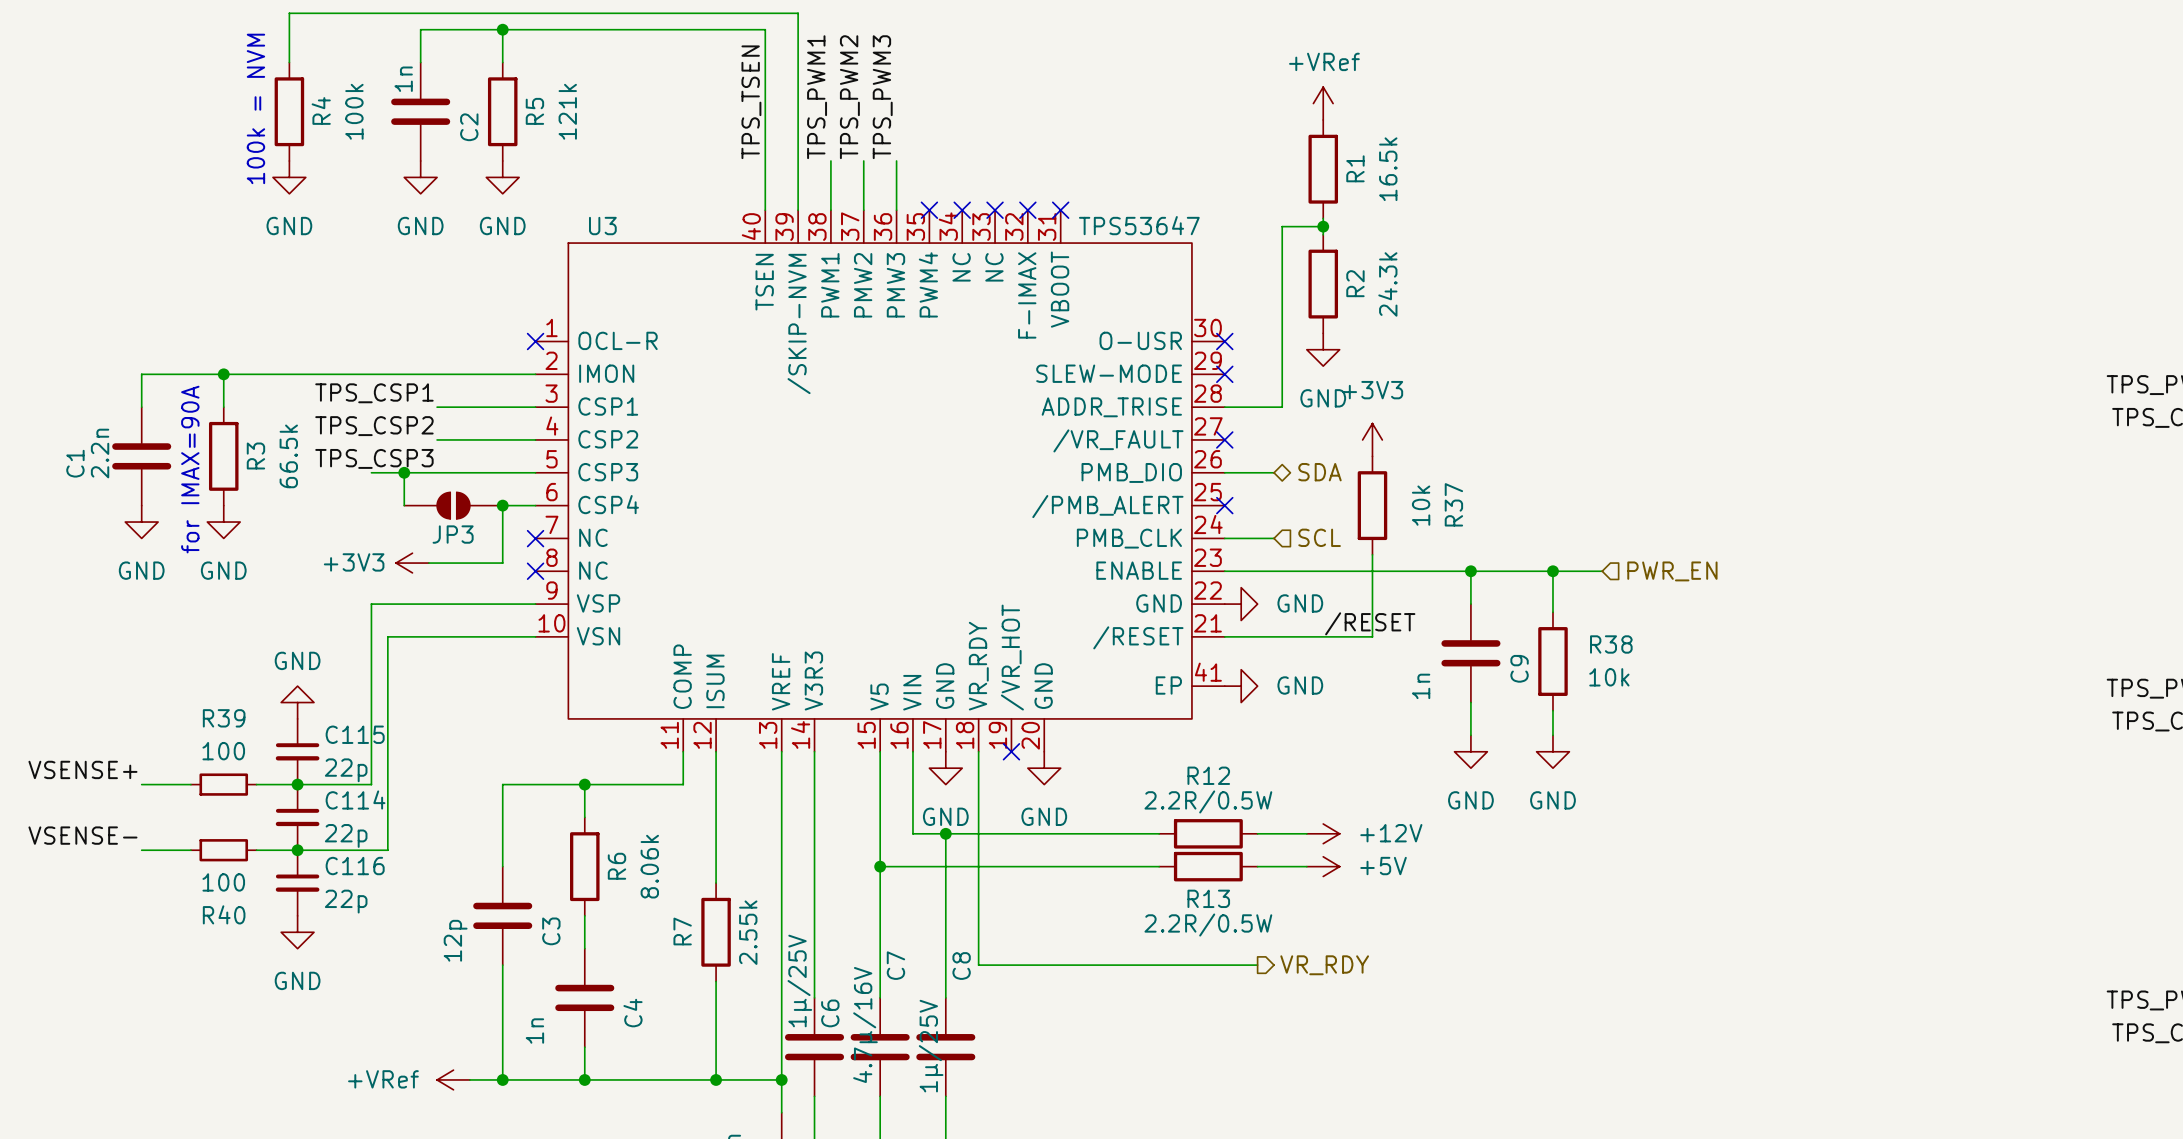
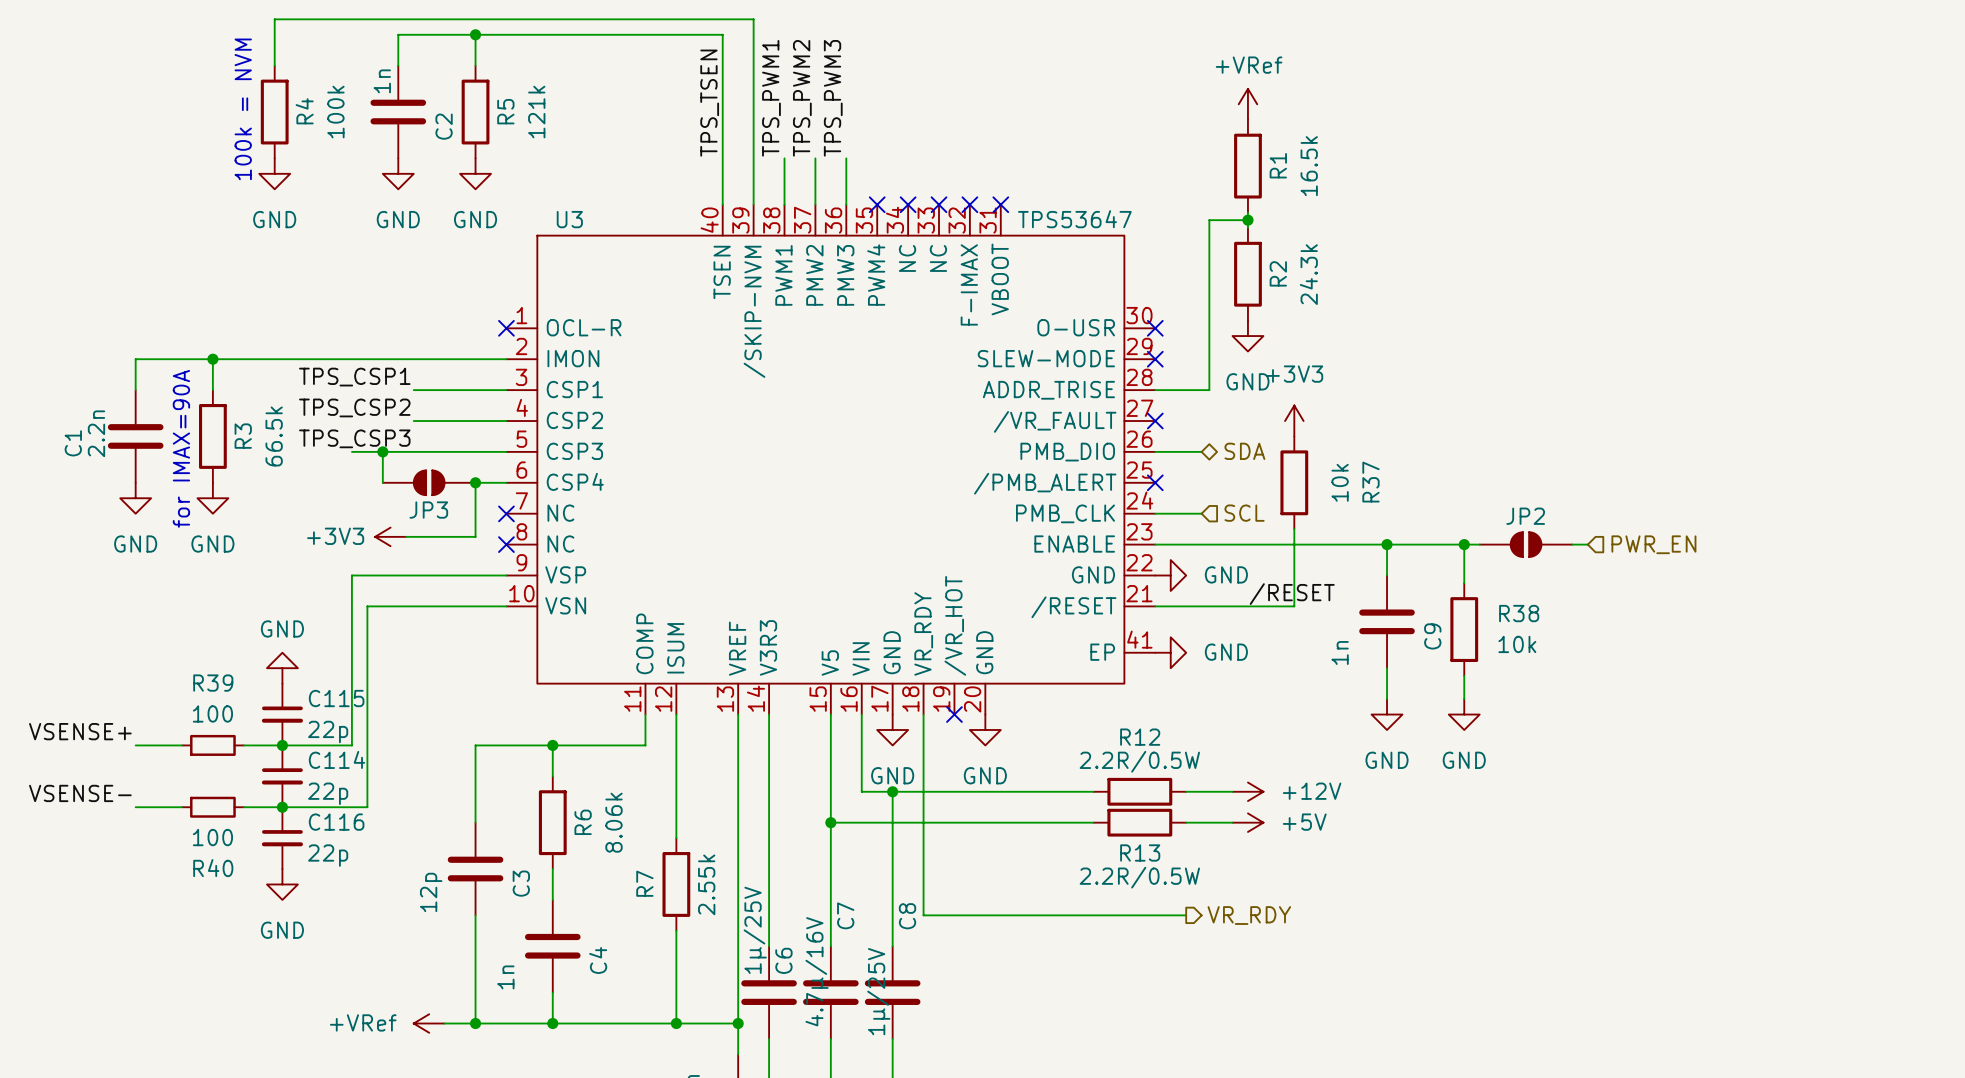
JP2: none -> (1526, 544)
wire: none -> (1572, 544) (1587, 544)
hierarchical label position: PWR_EN (1672, 571) -> PWR_EN (1653, 544)

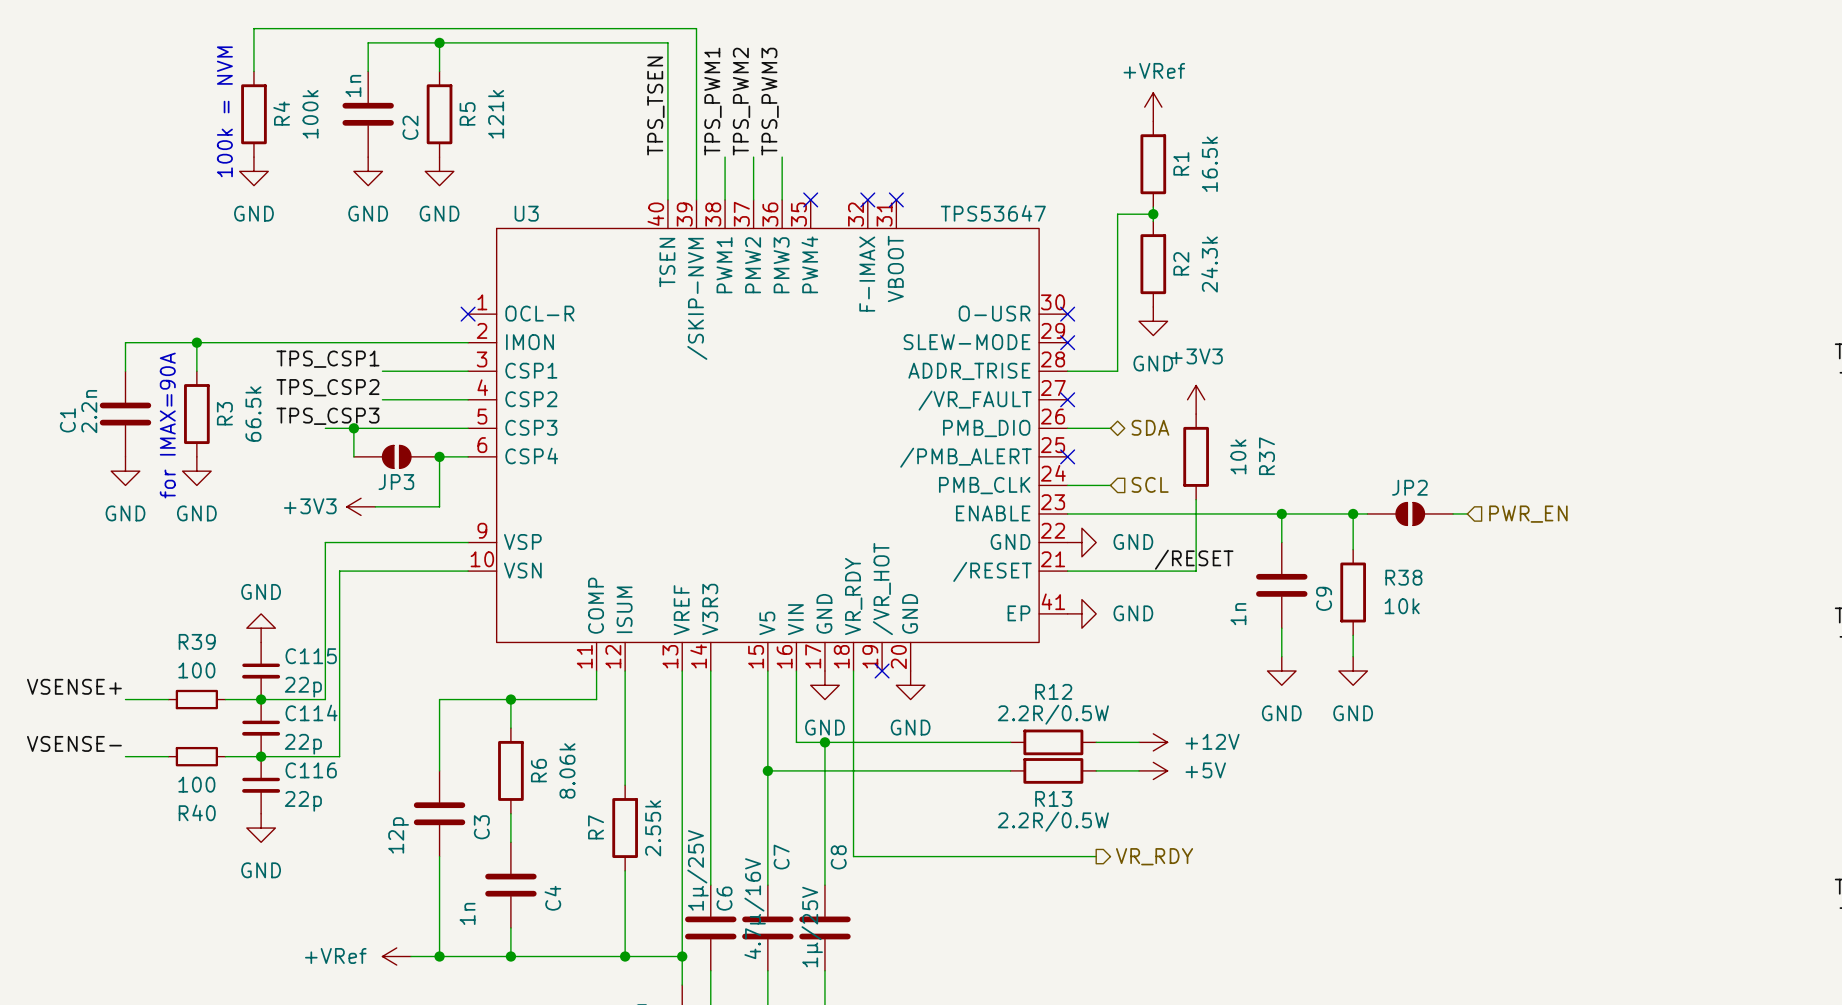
U3 symbol: [506, 204, 1156, 715] -> [468, 199, 1068, 672]
no-connect mark: (908, 204) -> none
no-connect mark: (1000, 204) -> none
no-connect mark: (506, 513) -> none
no-connect mark: (506, 544) -> none

